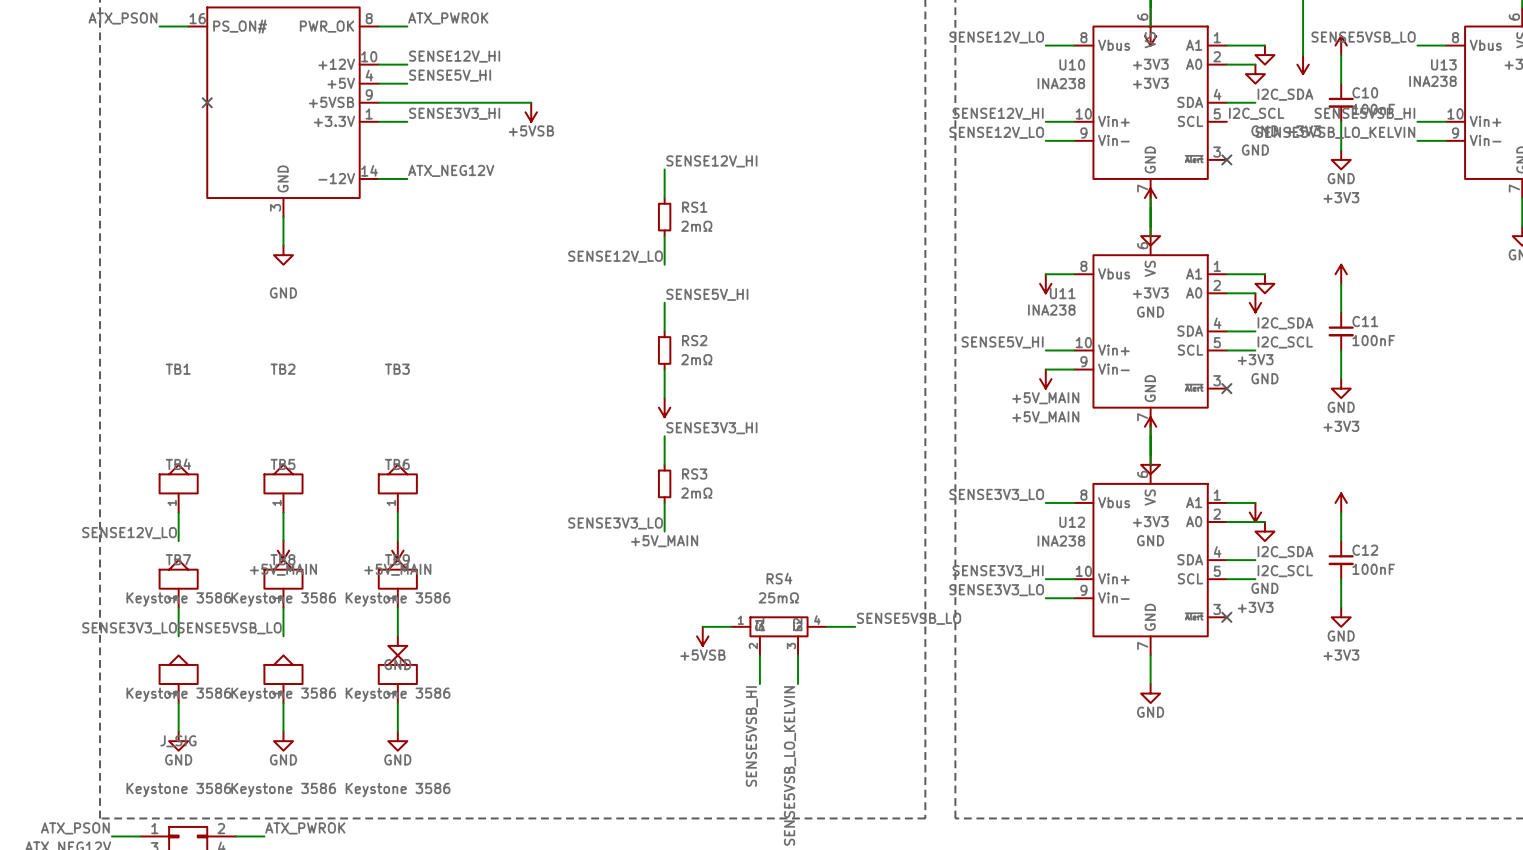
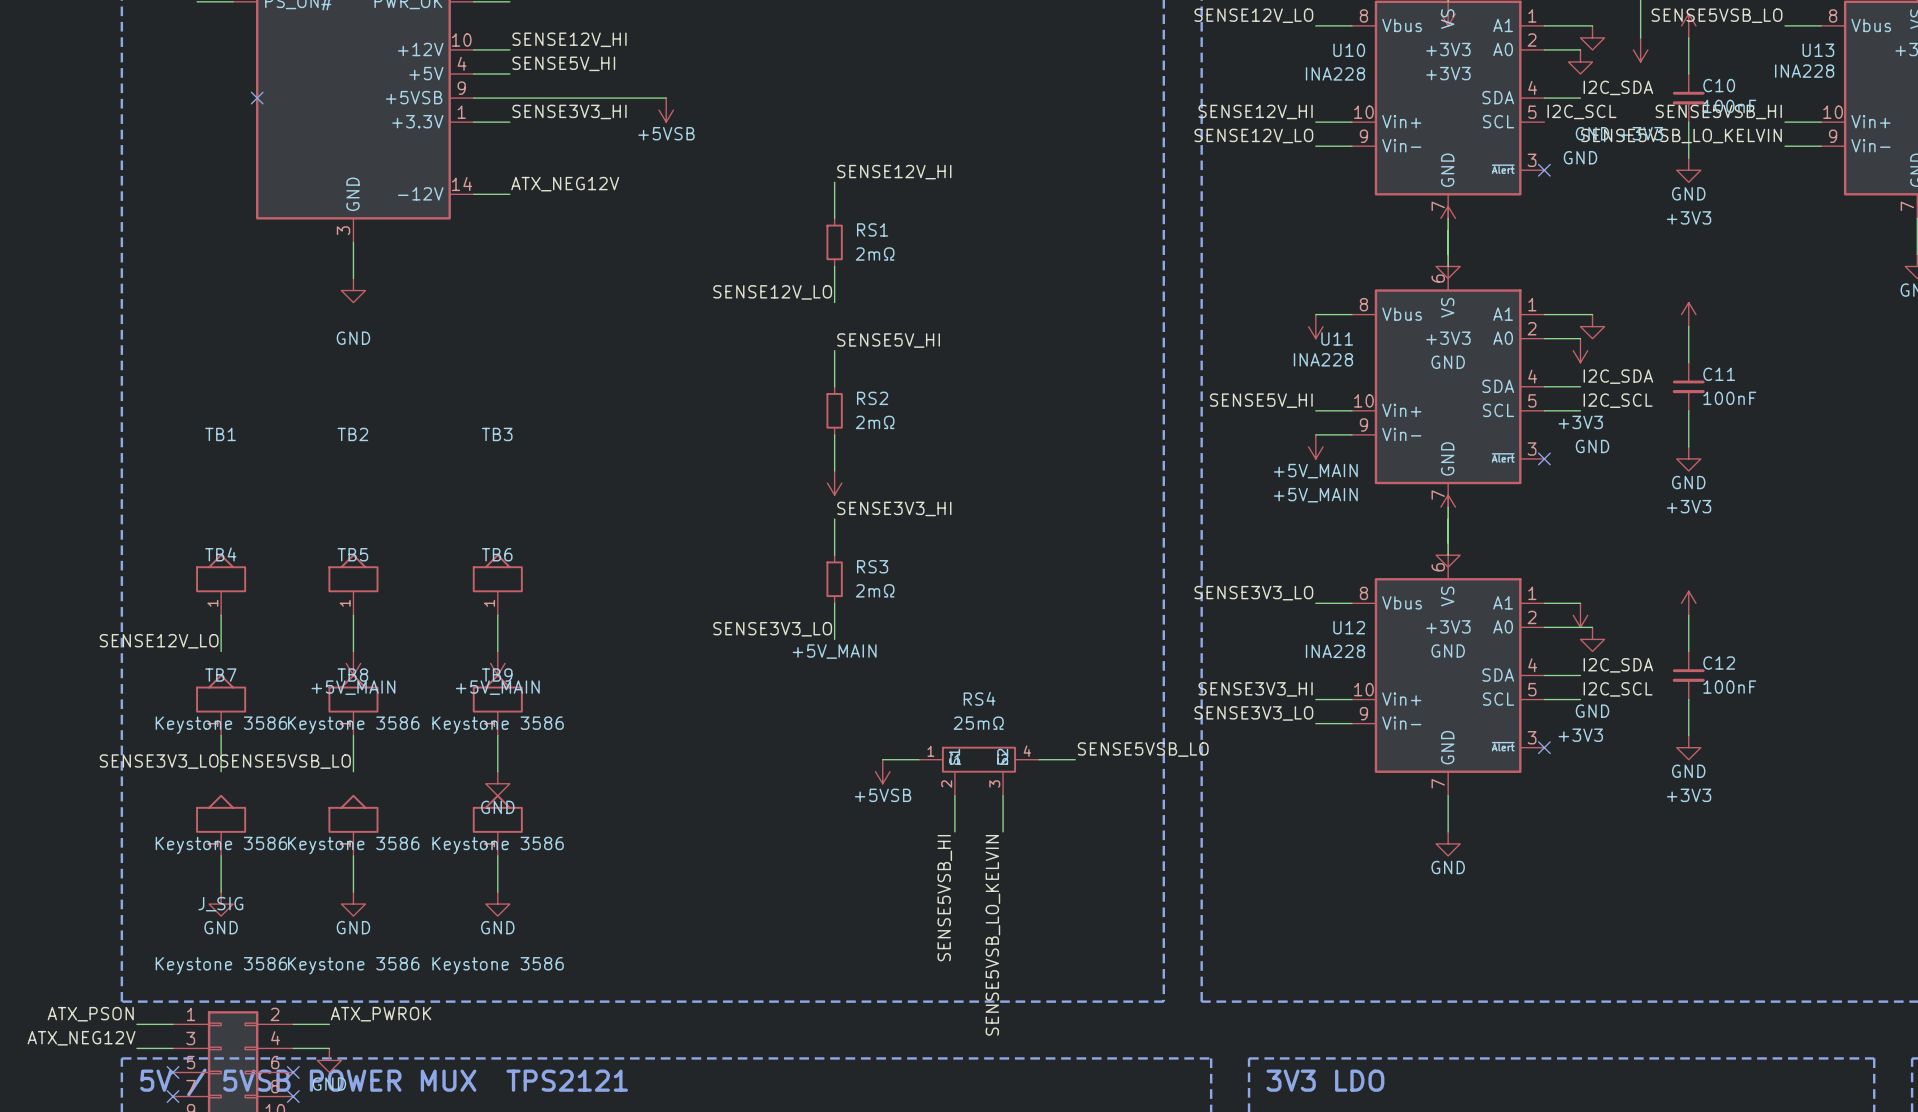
U13 value: INA238 (1432, 81) -> INA228 (1804, 71)
U10 value: INA238 (1061, 83) -> INA228 (1335, 73)
U11 value: INA238 (1051, 310) -> INA228 (1323, 359)
U12 value: INA238 (1061, 541) -> INA228 (1335, 651)

